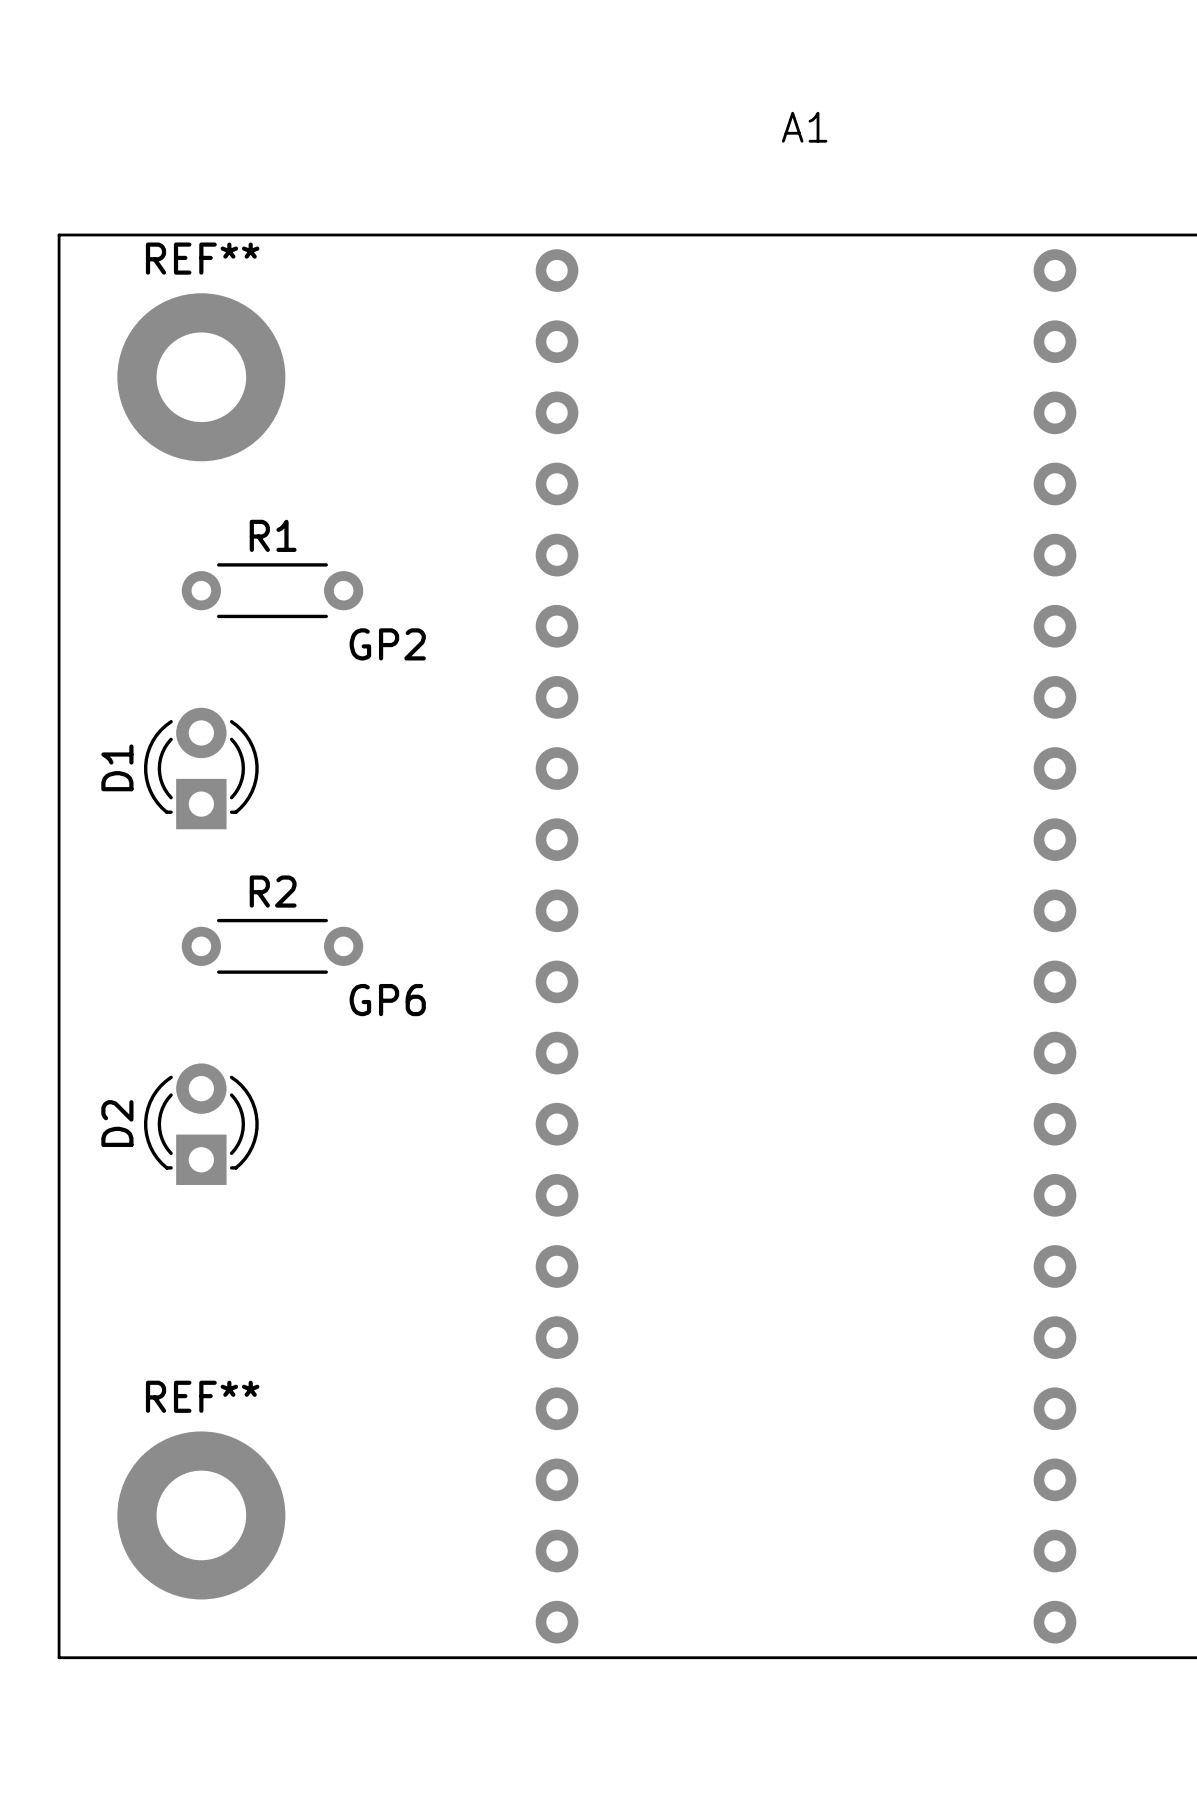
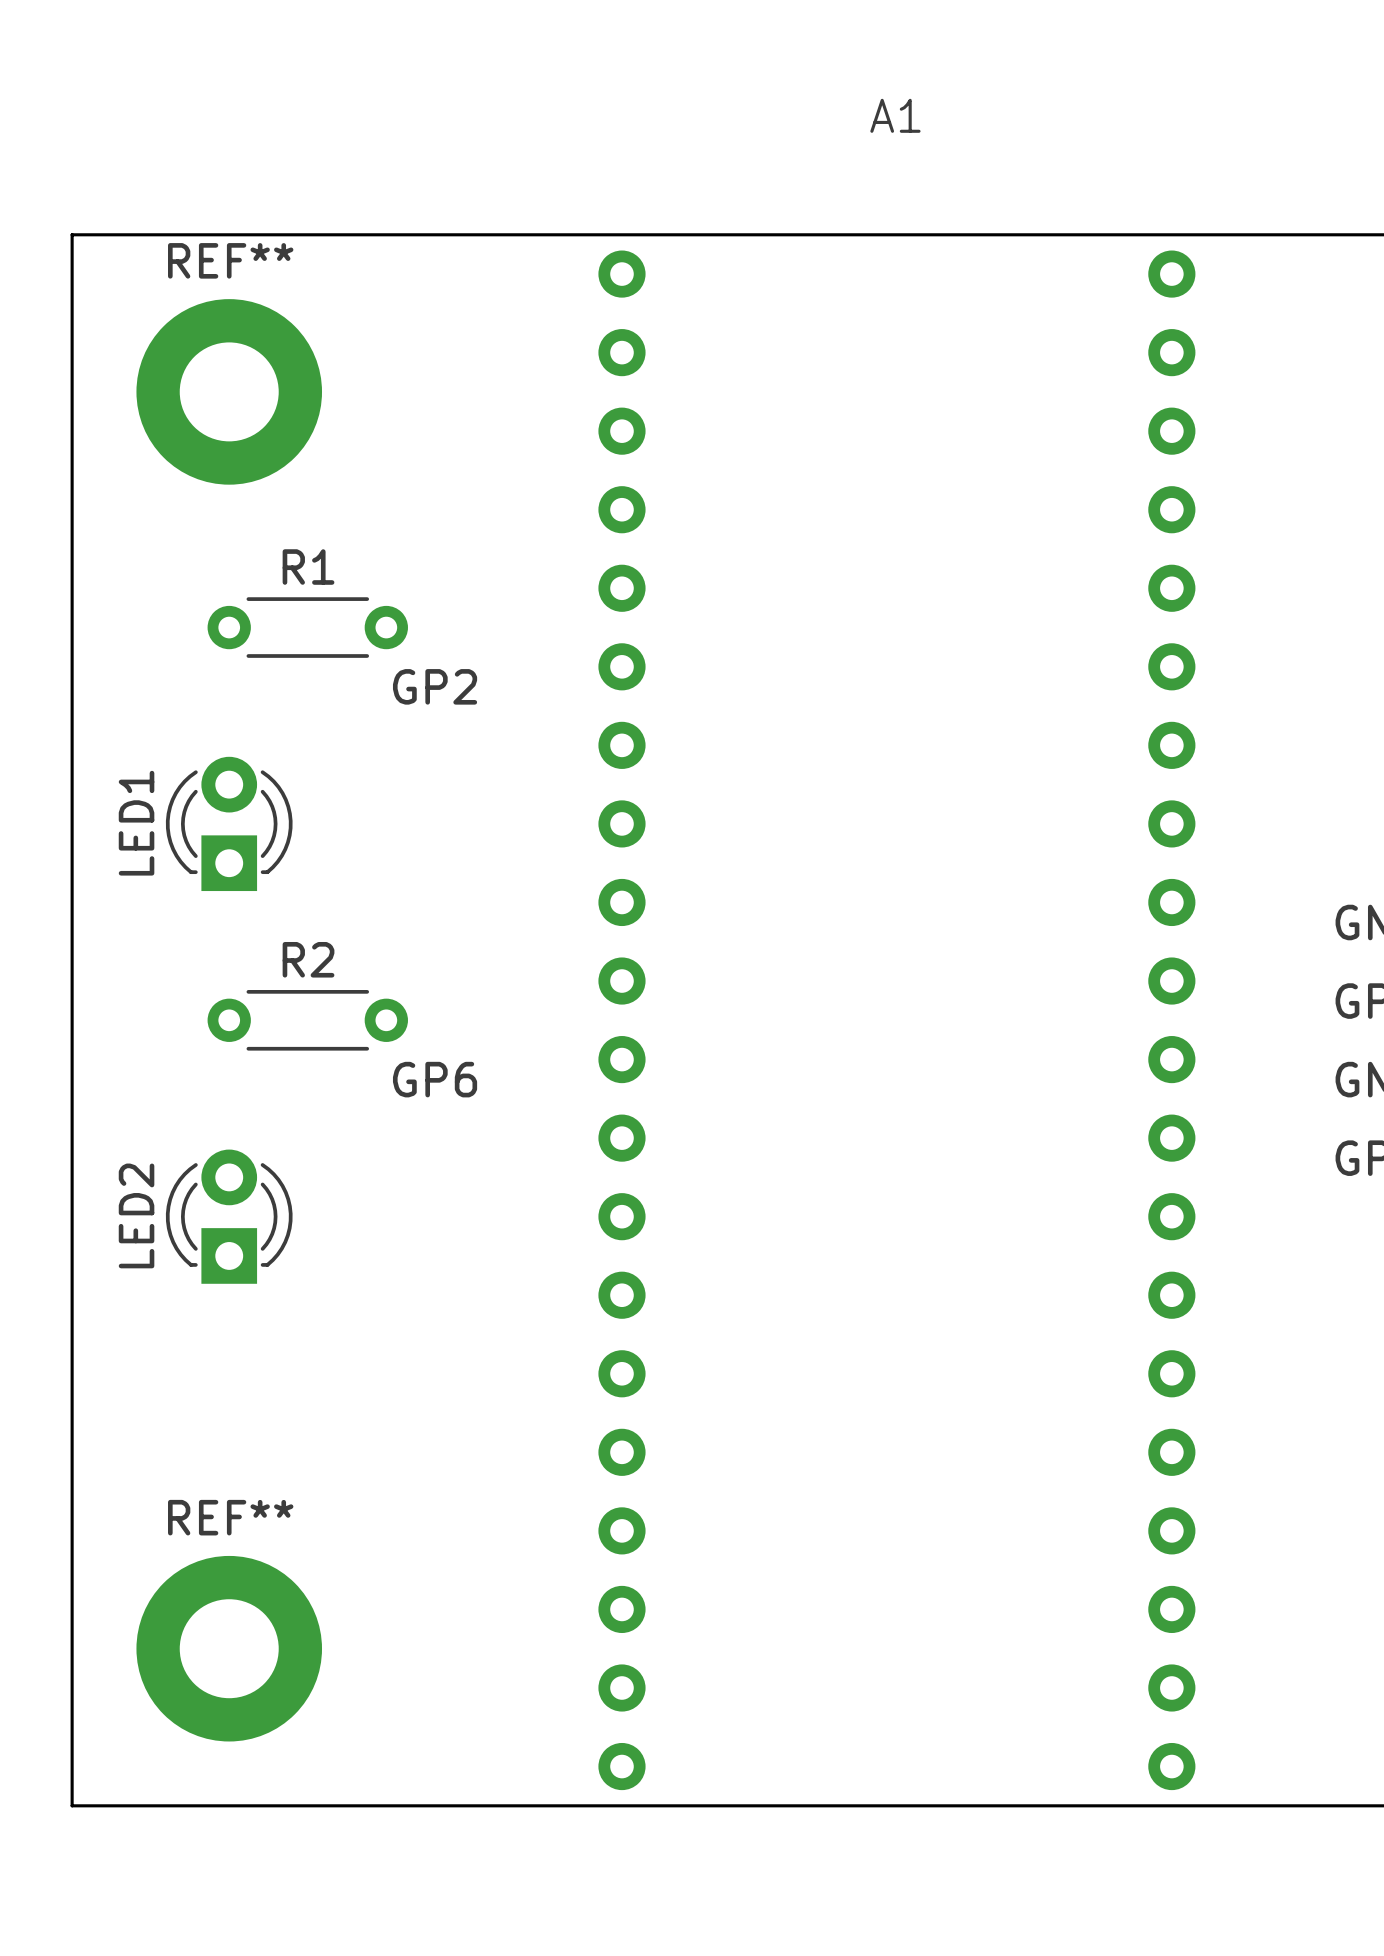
D1 name: D1 (117, 767) -> LED1 (136, 823)
D2 name: D2 (117, 1123) -> LED2 (136, 1215)

